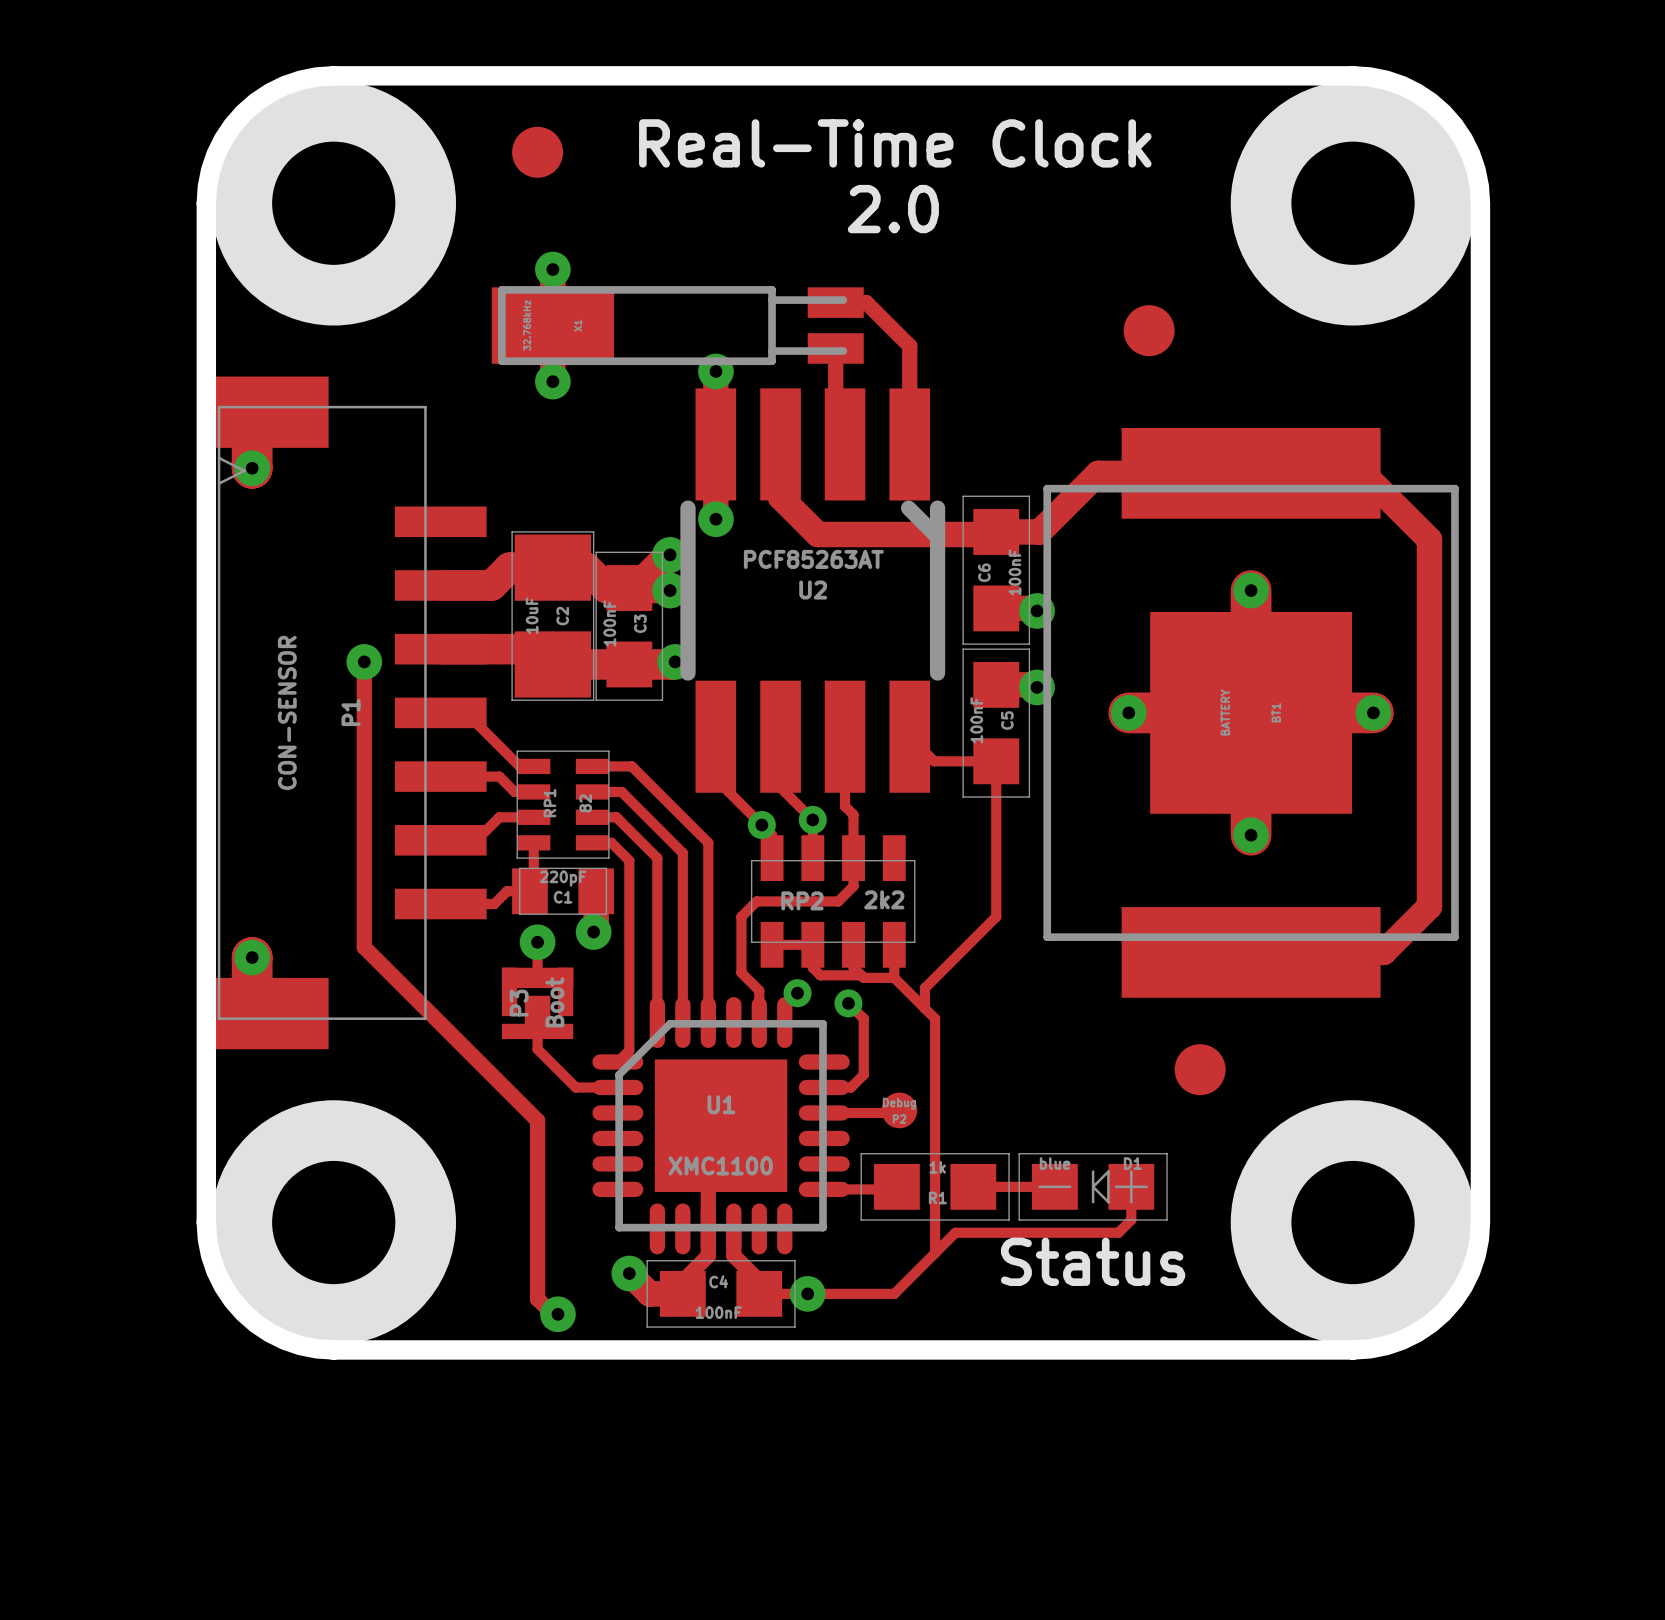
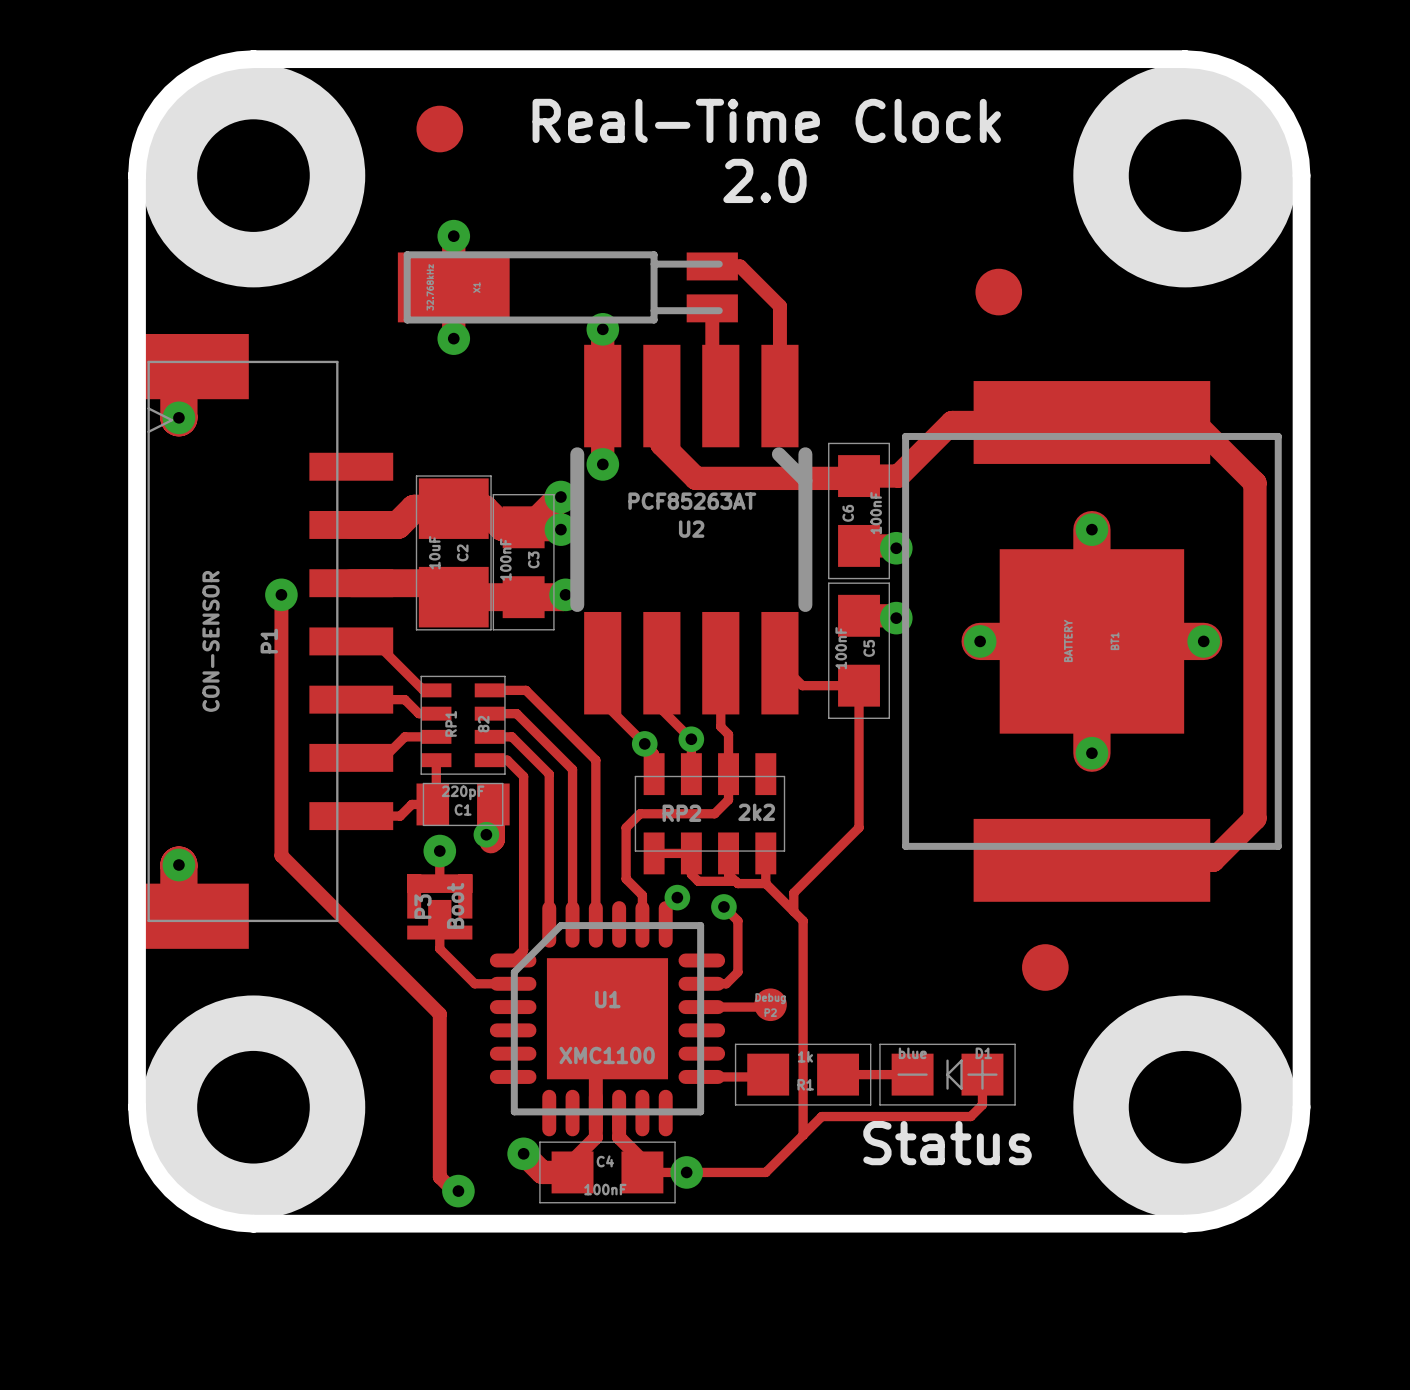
via size: [575, 914, 612, 950] -> [473, 821, 500, 848]

